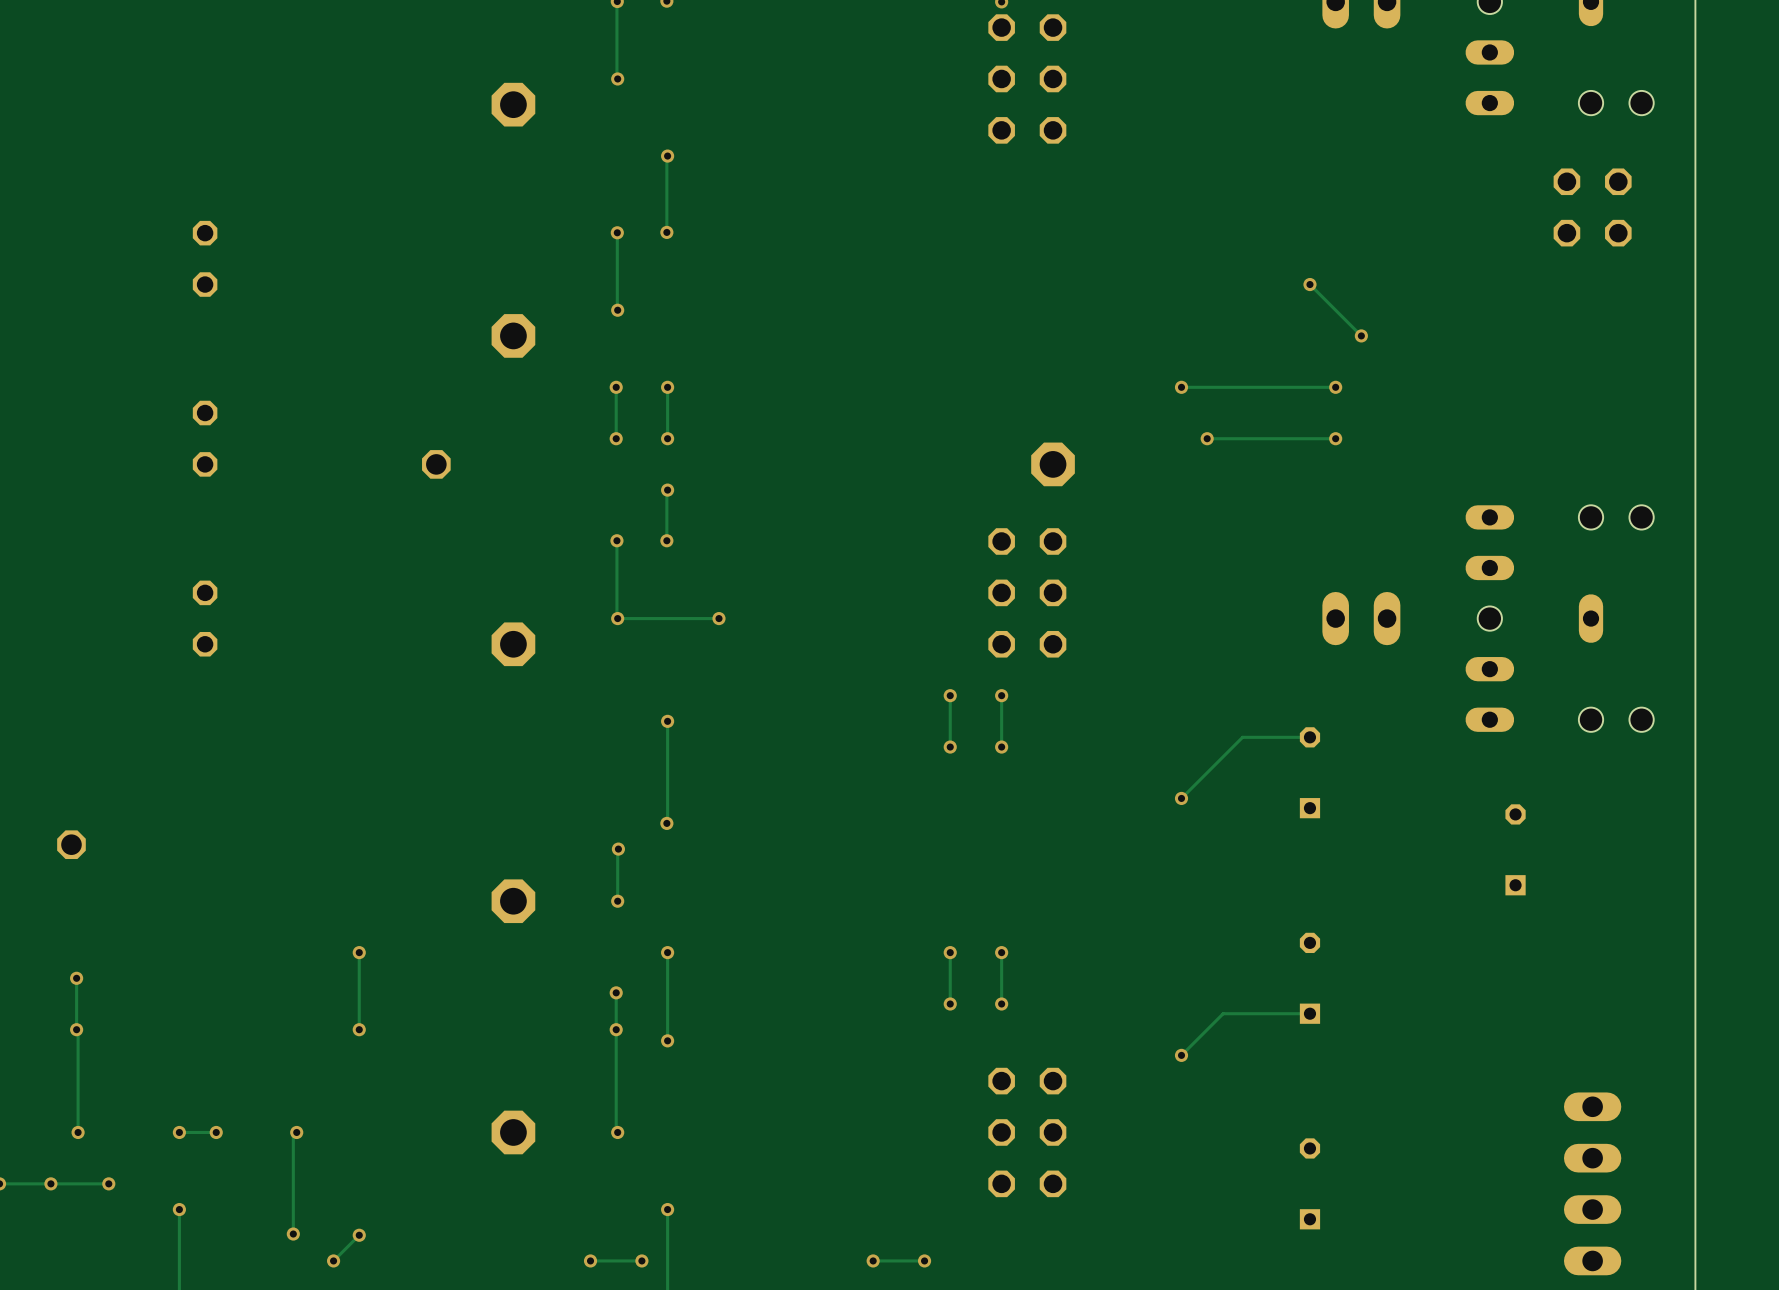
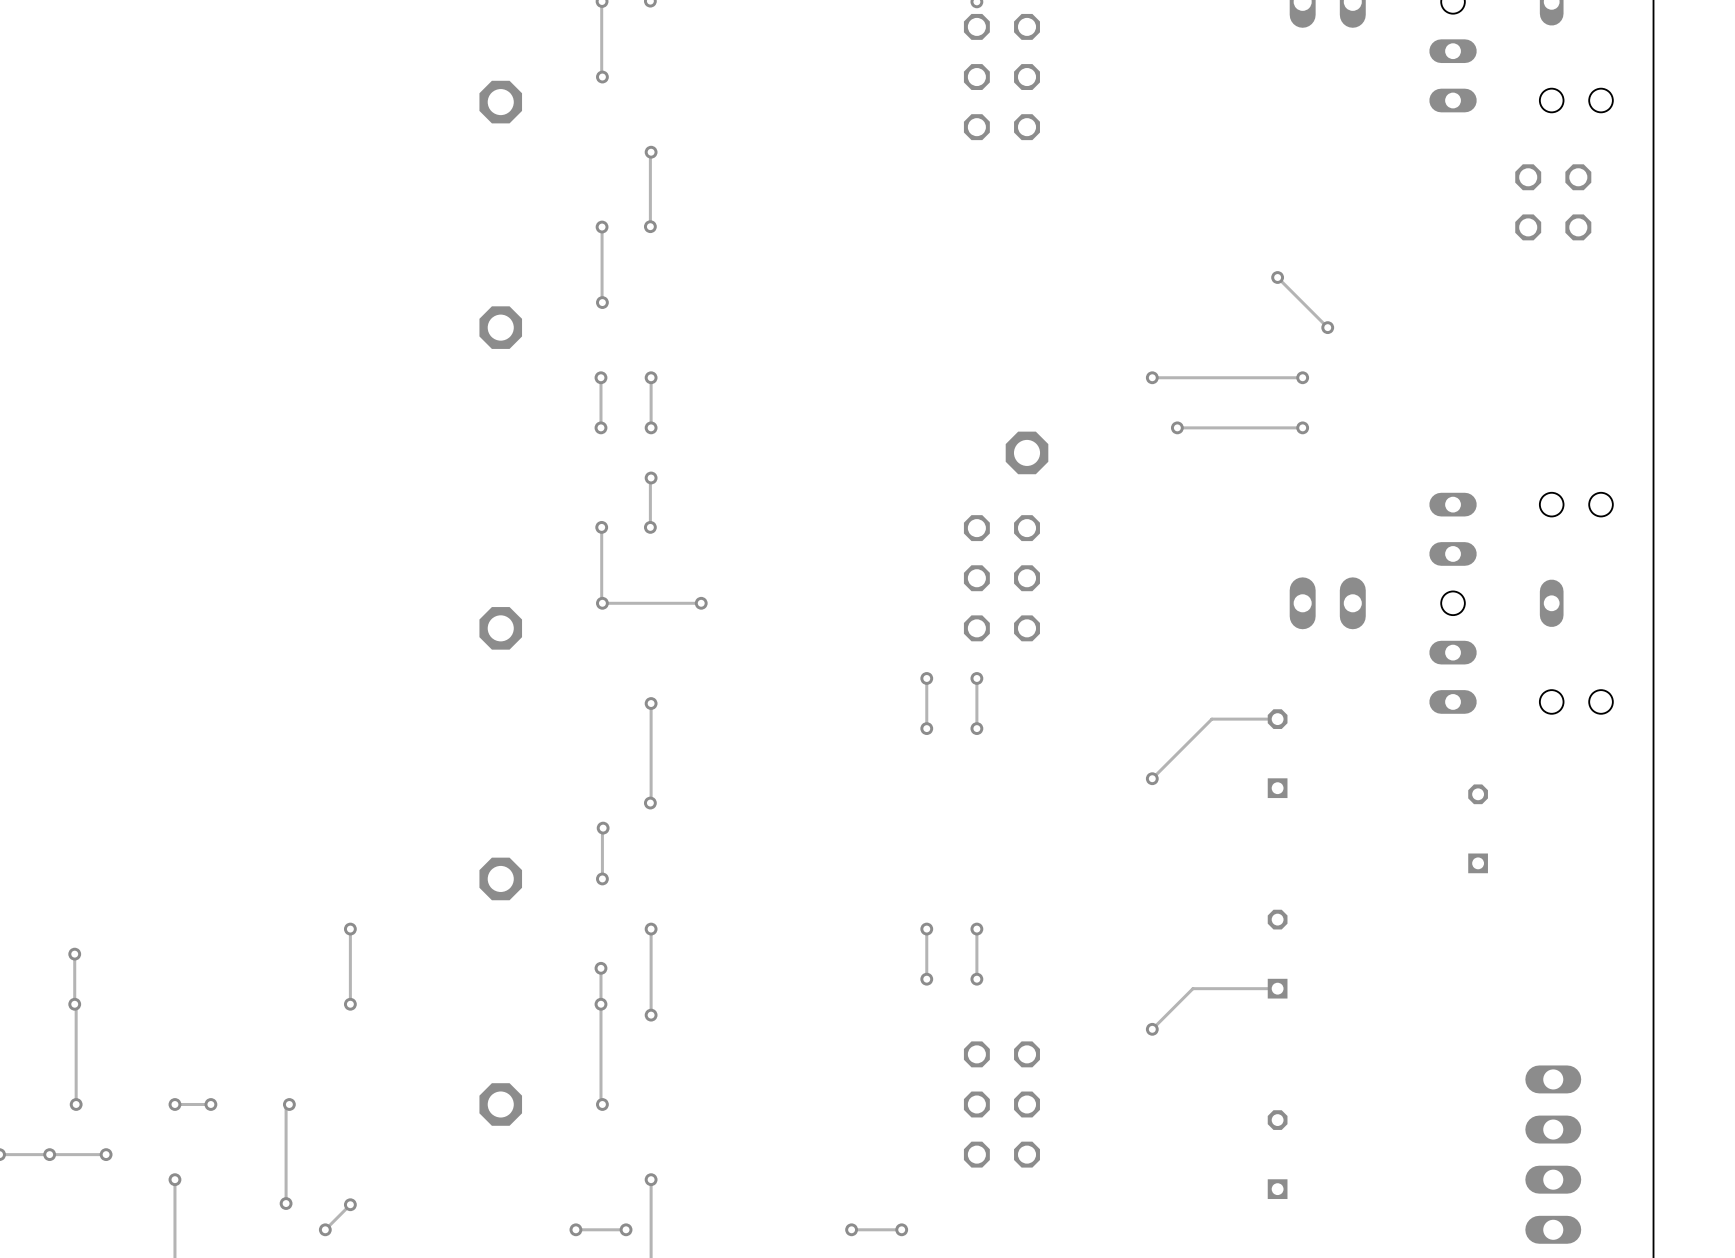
part: (205, 258) -> none
part: (205, 438) -> none
part: (436, 464) -> none
part: (205, 618) -> none
part: (71, 844) -> none

